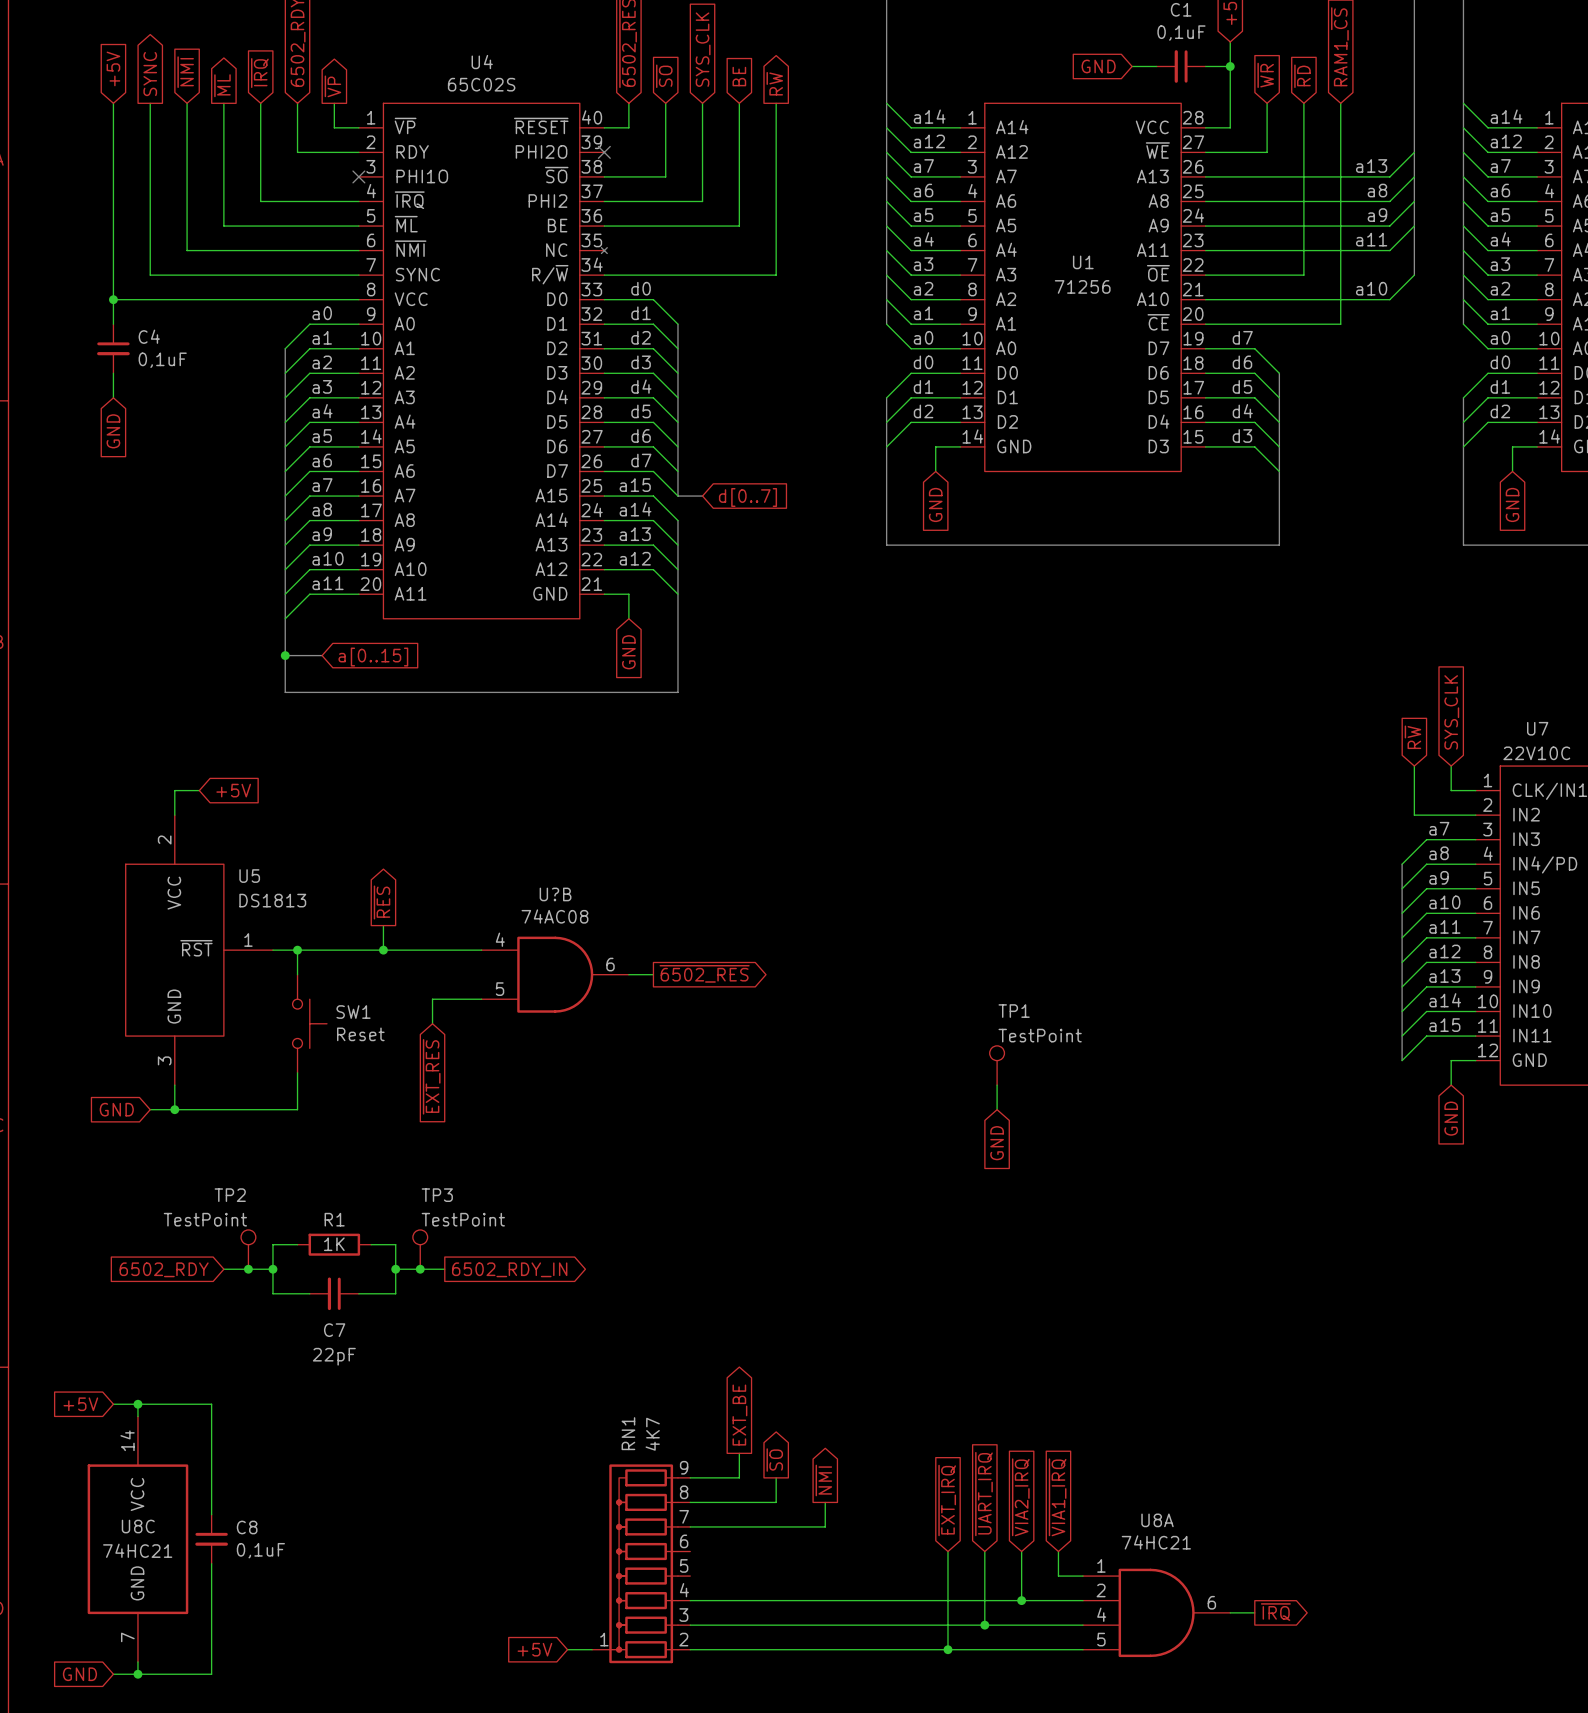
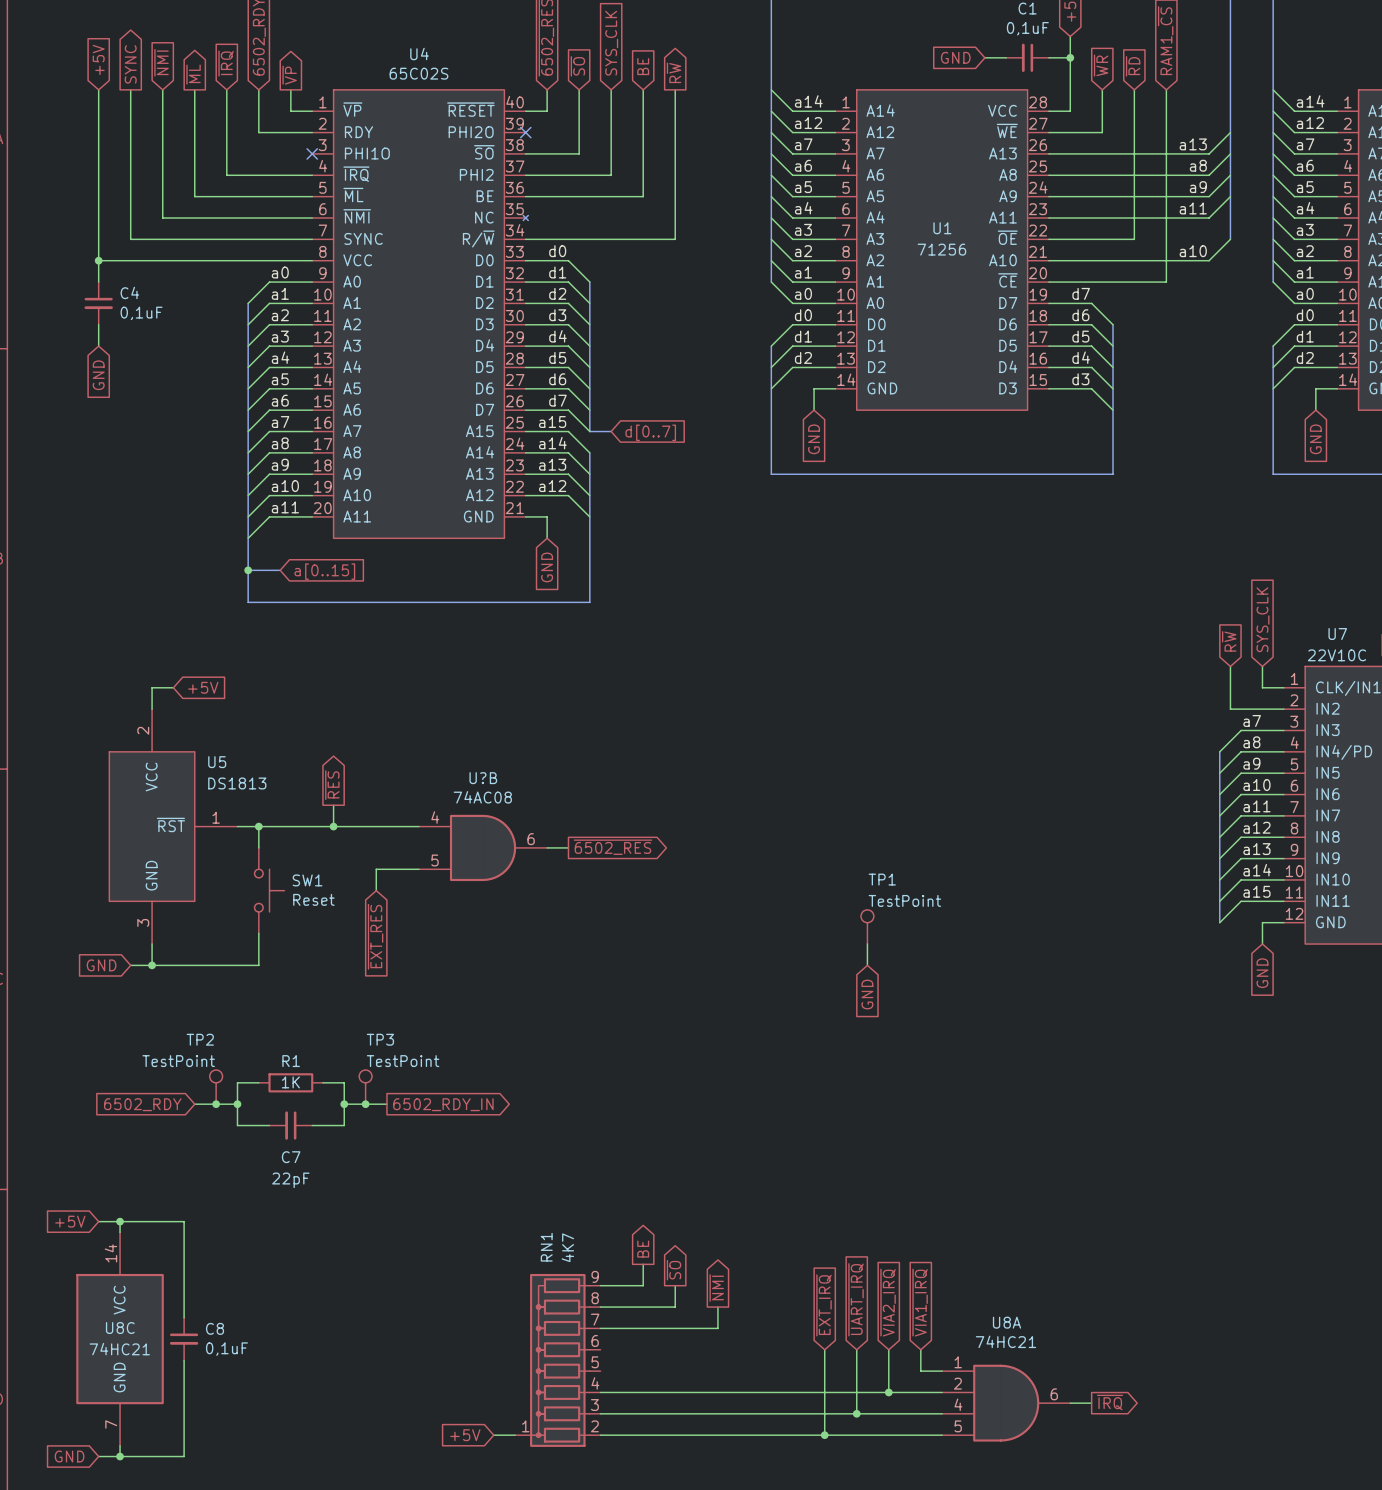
global label: EXT_BE (739, 1415) -> BE (643, 1249)

